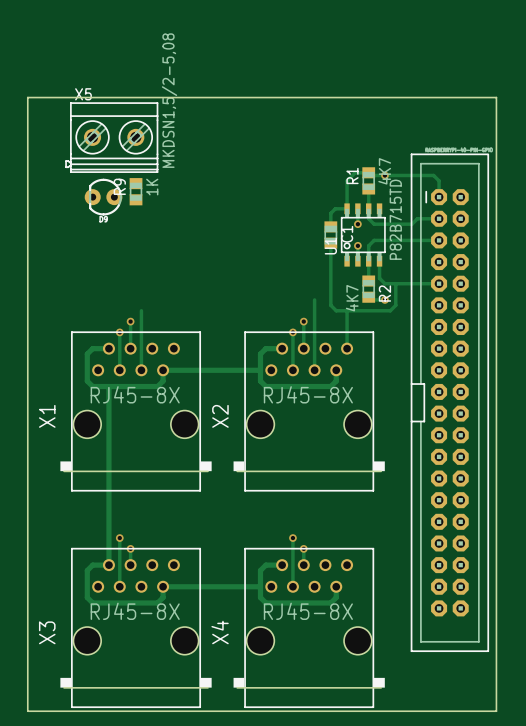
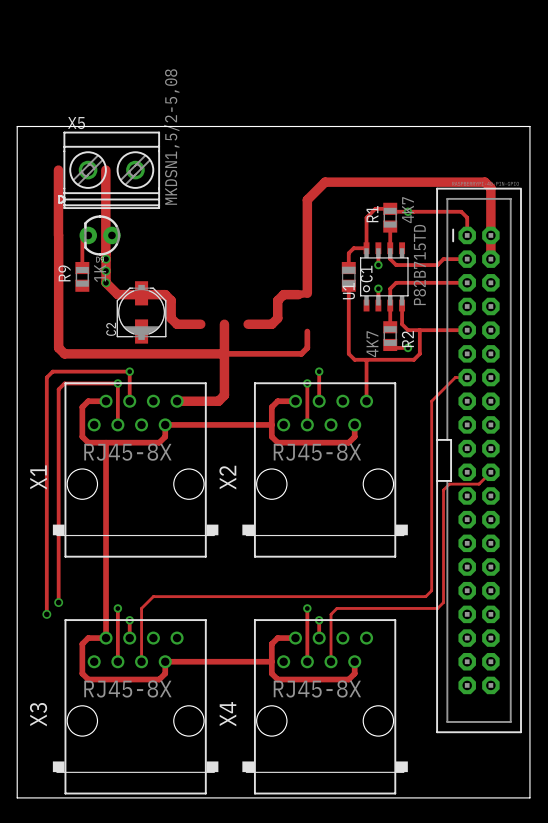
track: none -> (58, 170) (58, 347) (64, 353) (301, 353) (307, 347) (307, 331)
track: none -> (105, 170) (106, 282) (117, 294) (165, 294) (171, 300) (171, 318) (177, 324) (200, 324)
R9 position: (136, 191) -> (82, 276)
track: none -> (82, 235) (82, 268)
via: none -> (106, 259)
track: none -> (490, 259) (490, 188) (484, 182) (325, 182) (307, 199) (307, 293) (283, 294) (277, 300) (277, 318) (271, 324) (248, 324)
via: none -> (106, 270)
via: none -> (106, 282)
C2: none -> (141, 312)
track: none -> (224, 324) (224, 395) (218, 401) (177, 401)
track: (314, 299) (314, 370) -> none
track: (141, 310) (141, 370) -> none
track: none -> (129, 371) (52, 371) (46, 377) (46, 614)
track: none -> (467, 377) (455, 377) (431, 401) (431, 590) (425, 596) (153, 596) (141, 608) (141, 661)
X1 footprint: [60, 331, 212, 492] -> [52, 382, 219, 558]
X2 footprint: [233, 331, 385, 492] -> [242, 382, 408, 558]
track: none -> (117, 383) (64, 383) (58, 389) (58, 602)
track: none -> (490, 472) (479, 484) (449, 484) (443, 490) (443, 602) (437, 608) (336, 608) (331, 614) (331, 661)
via: none -> (58, 602)
via: none -> (46, 614)
X3 footprint: [60, 547, 212, 709] -> [52, 619, 219, 795]
X4 footprint: [233, 547, 385, 709] -> [242, 619, 408, 795]

